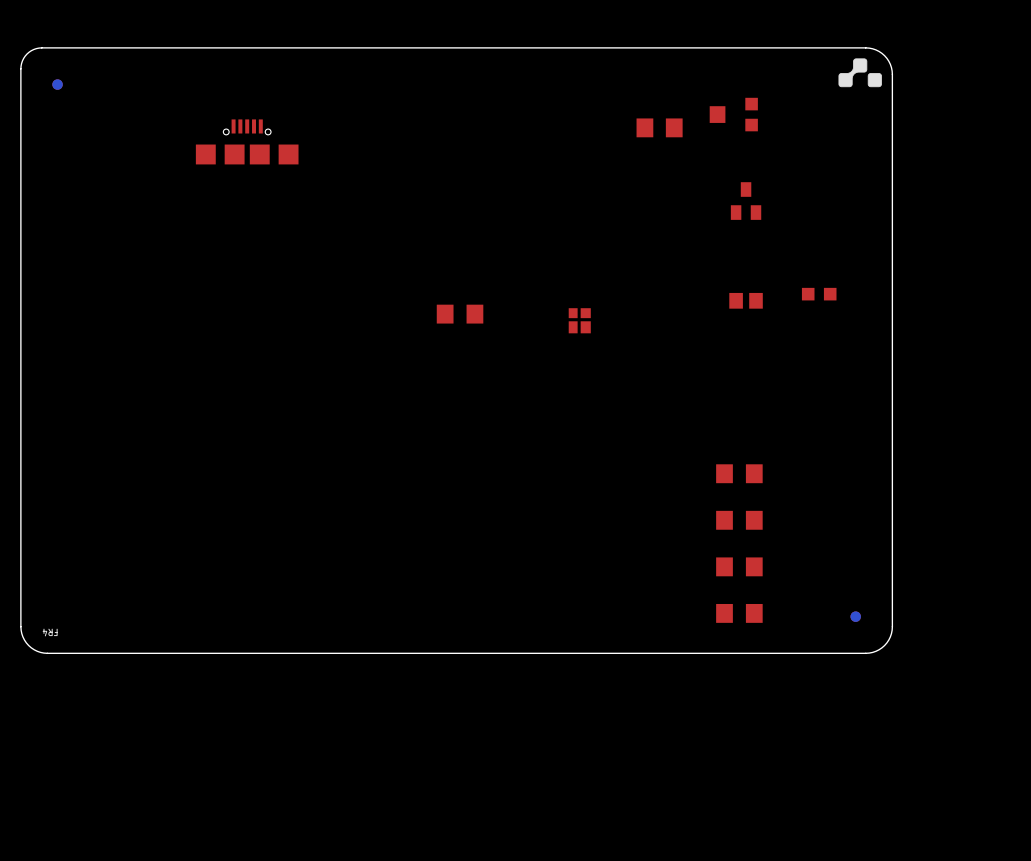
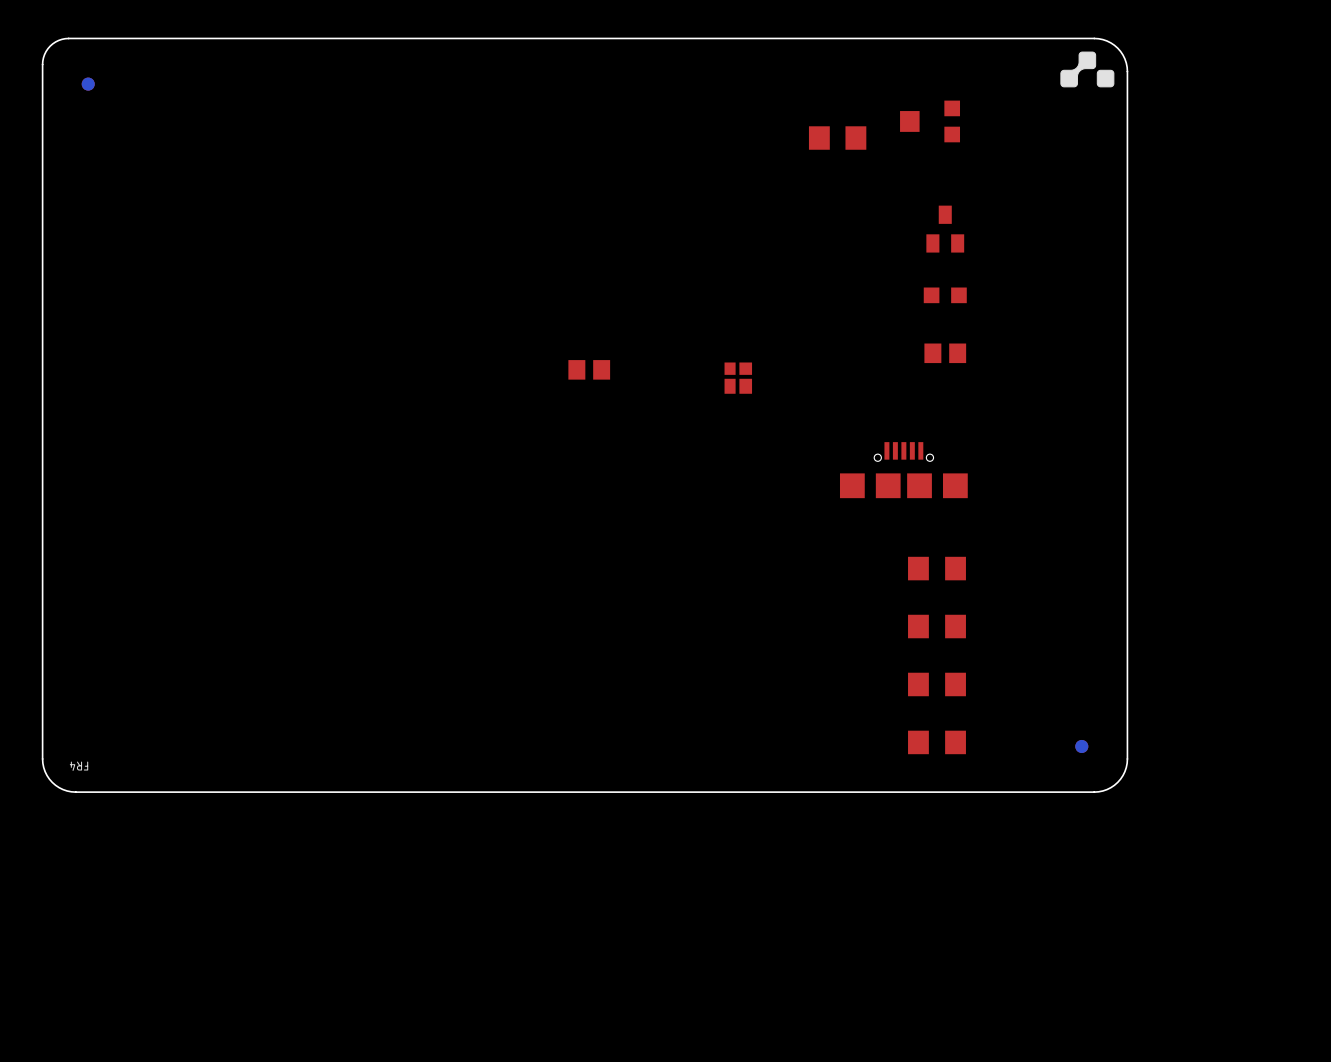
part: (247, 141) -> none
part position: (819, 294) -> (945, 295)
part footprint: [436, 304, 484, 324] -> [568, 360, 611, 380]
part: none -> (903, 470)

